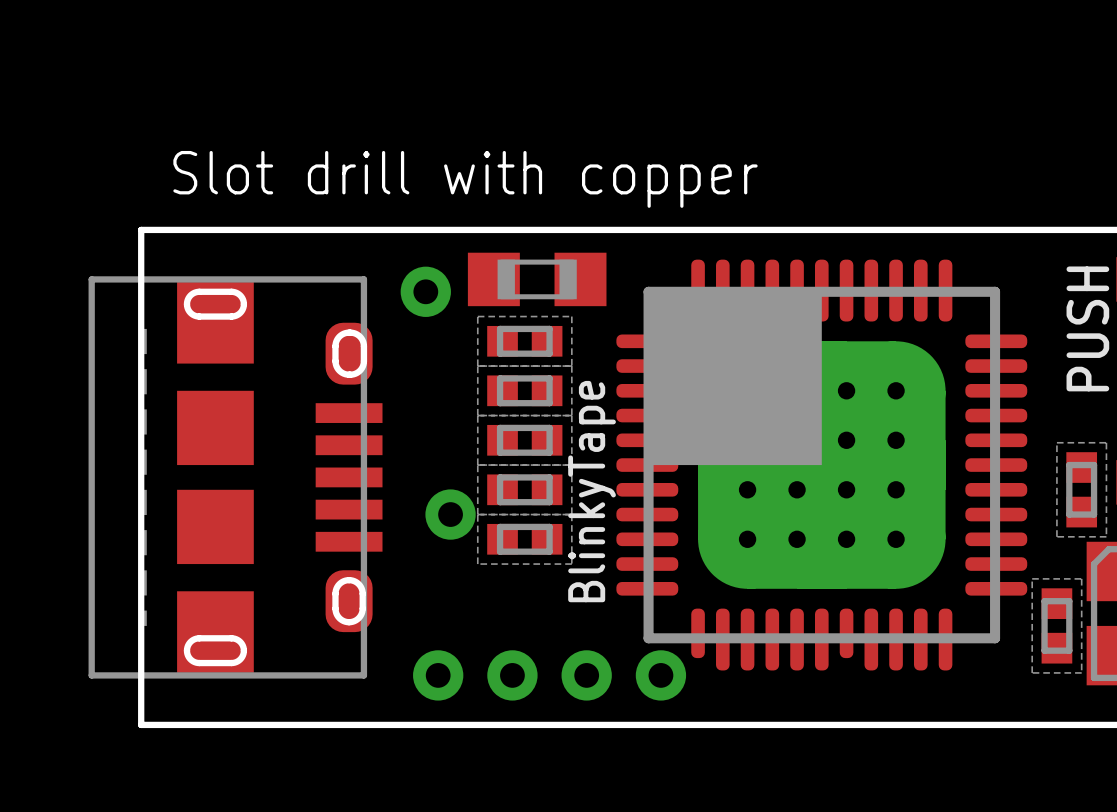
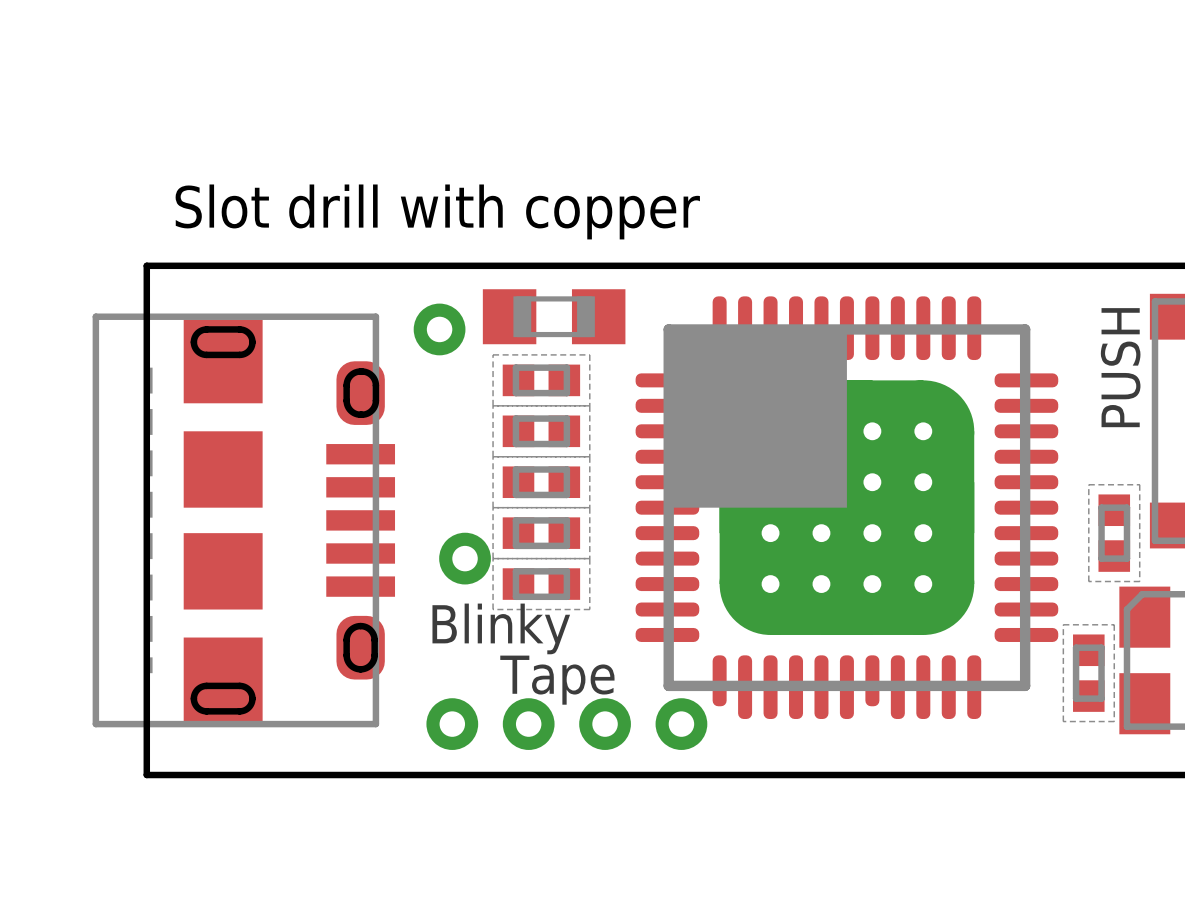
text: BlinkyTape (592, 491) -> Blinky (501, 628)
text: none -> Tape (557, 680)

